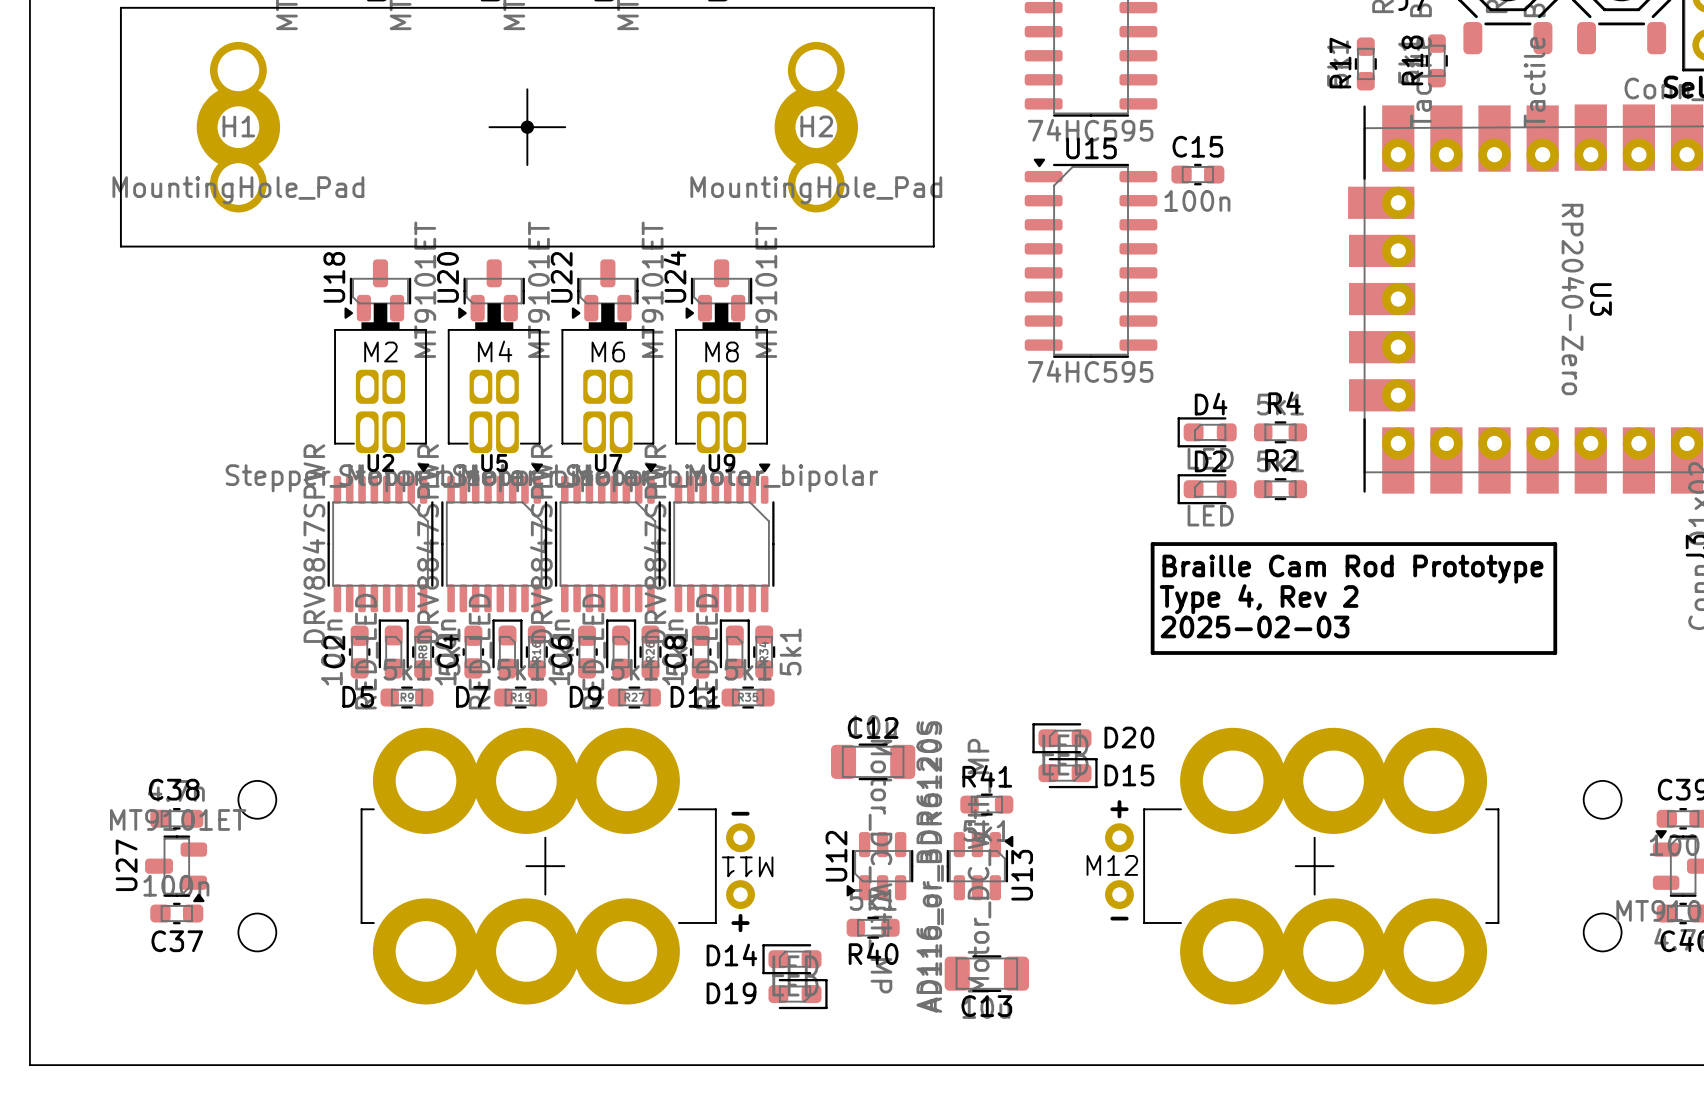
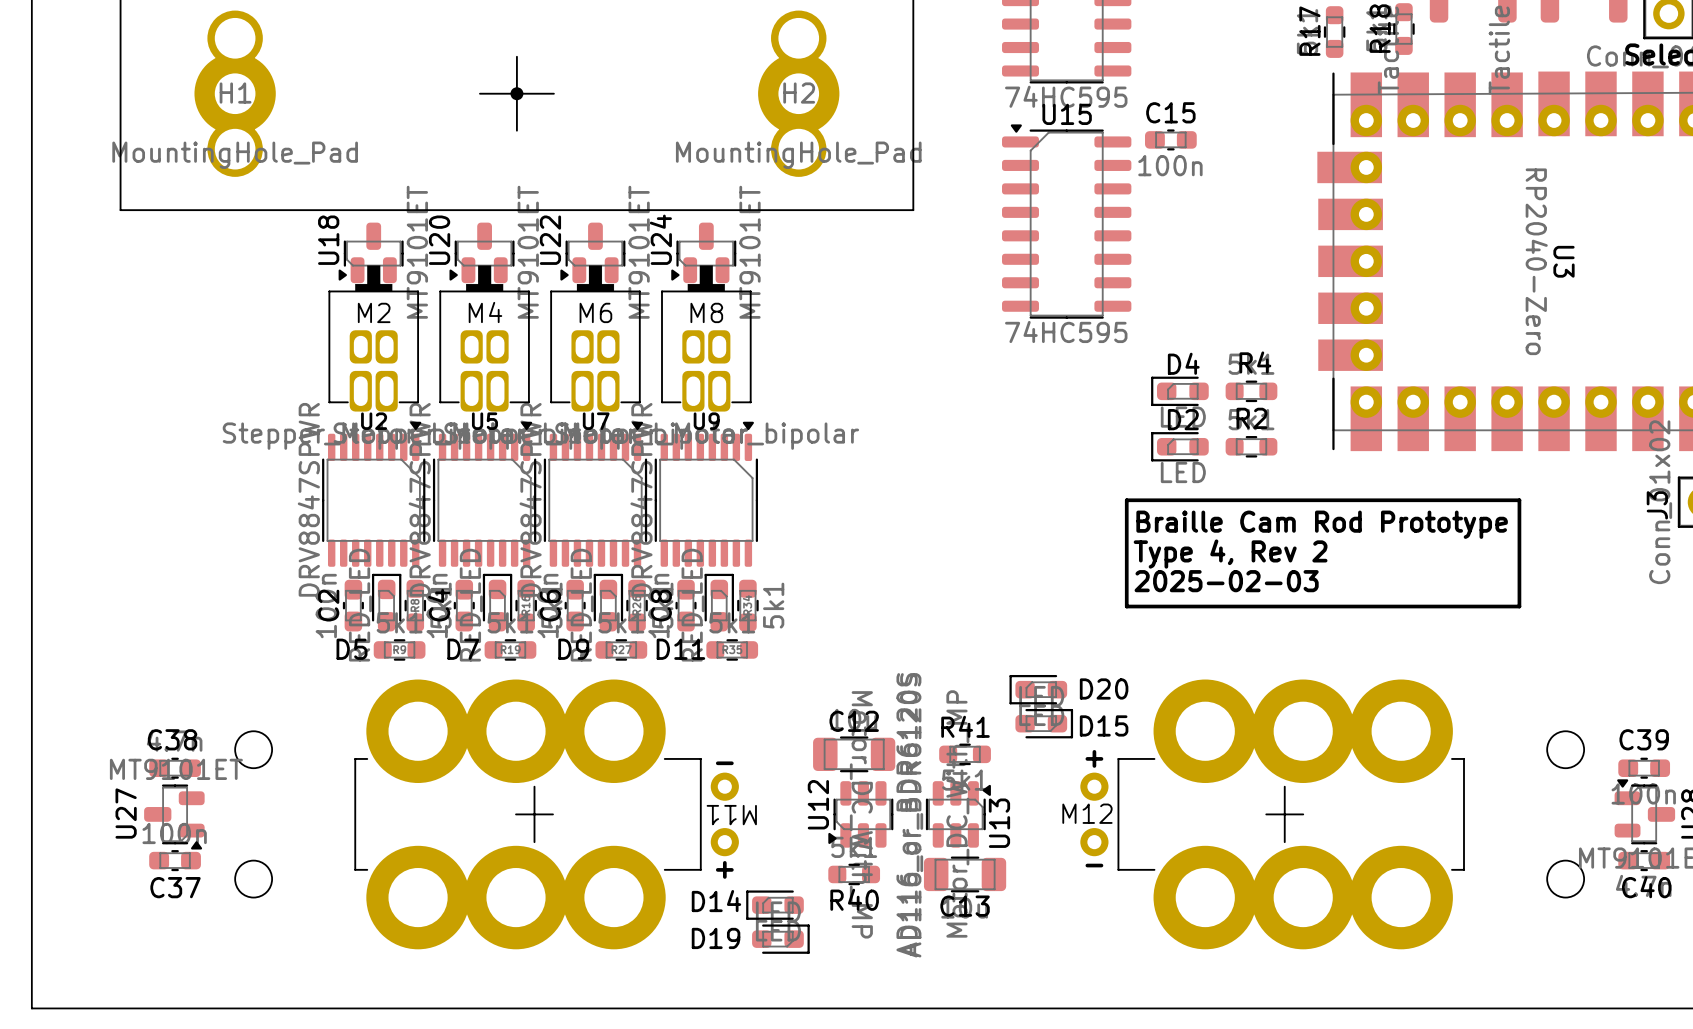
C12 position: (873, 761) -> (854, 754)
C13 position: (986, 973) -> (965, 874)

